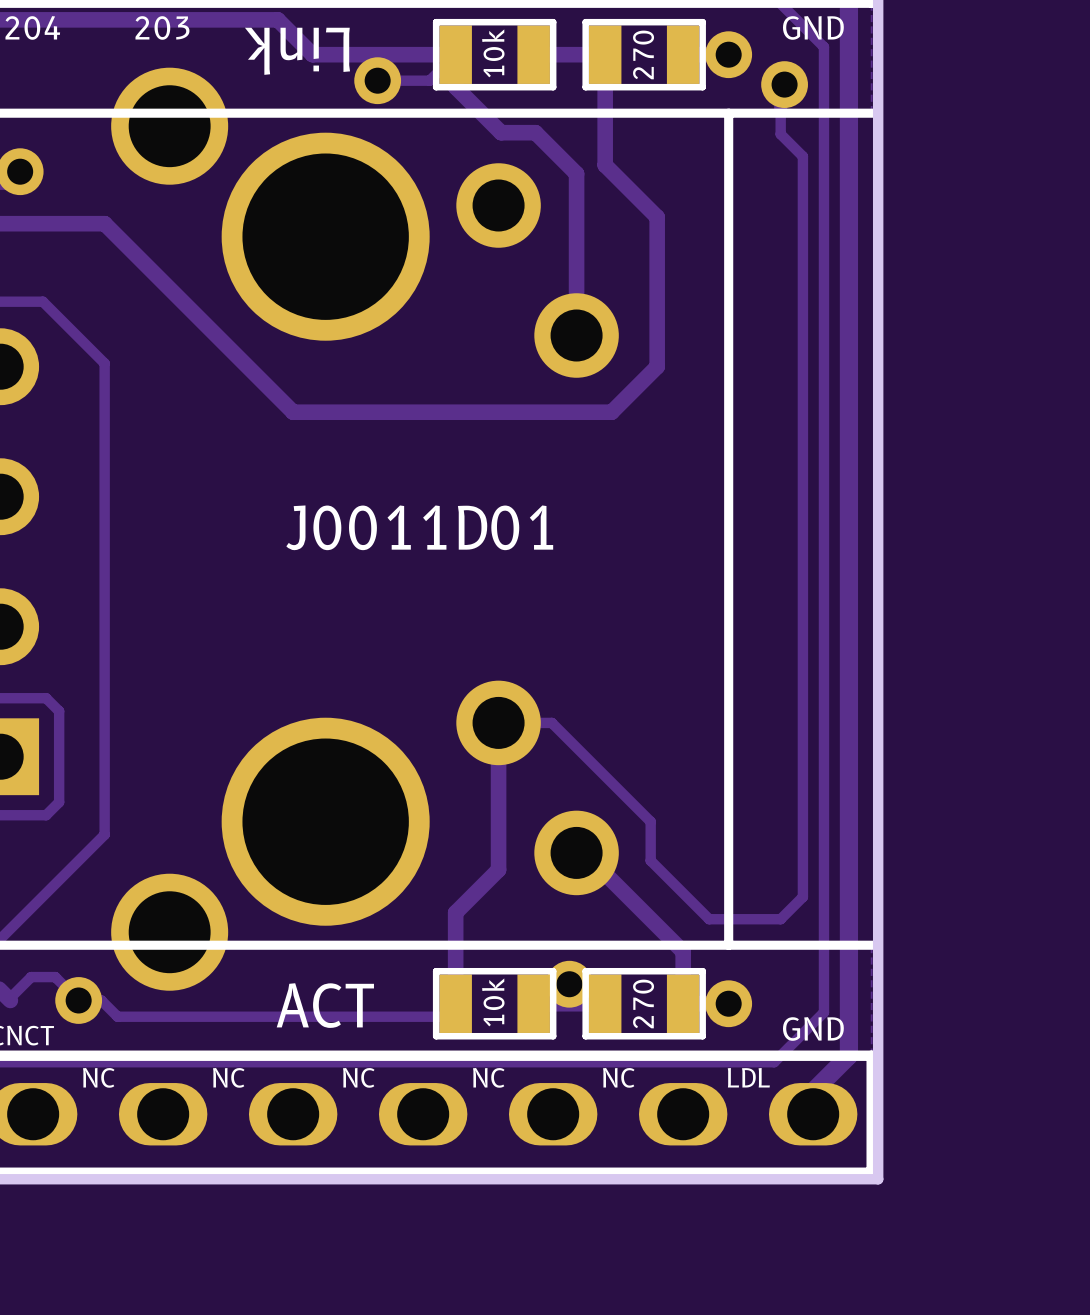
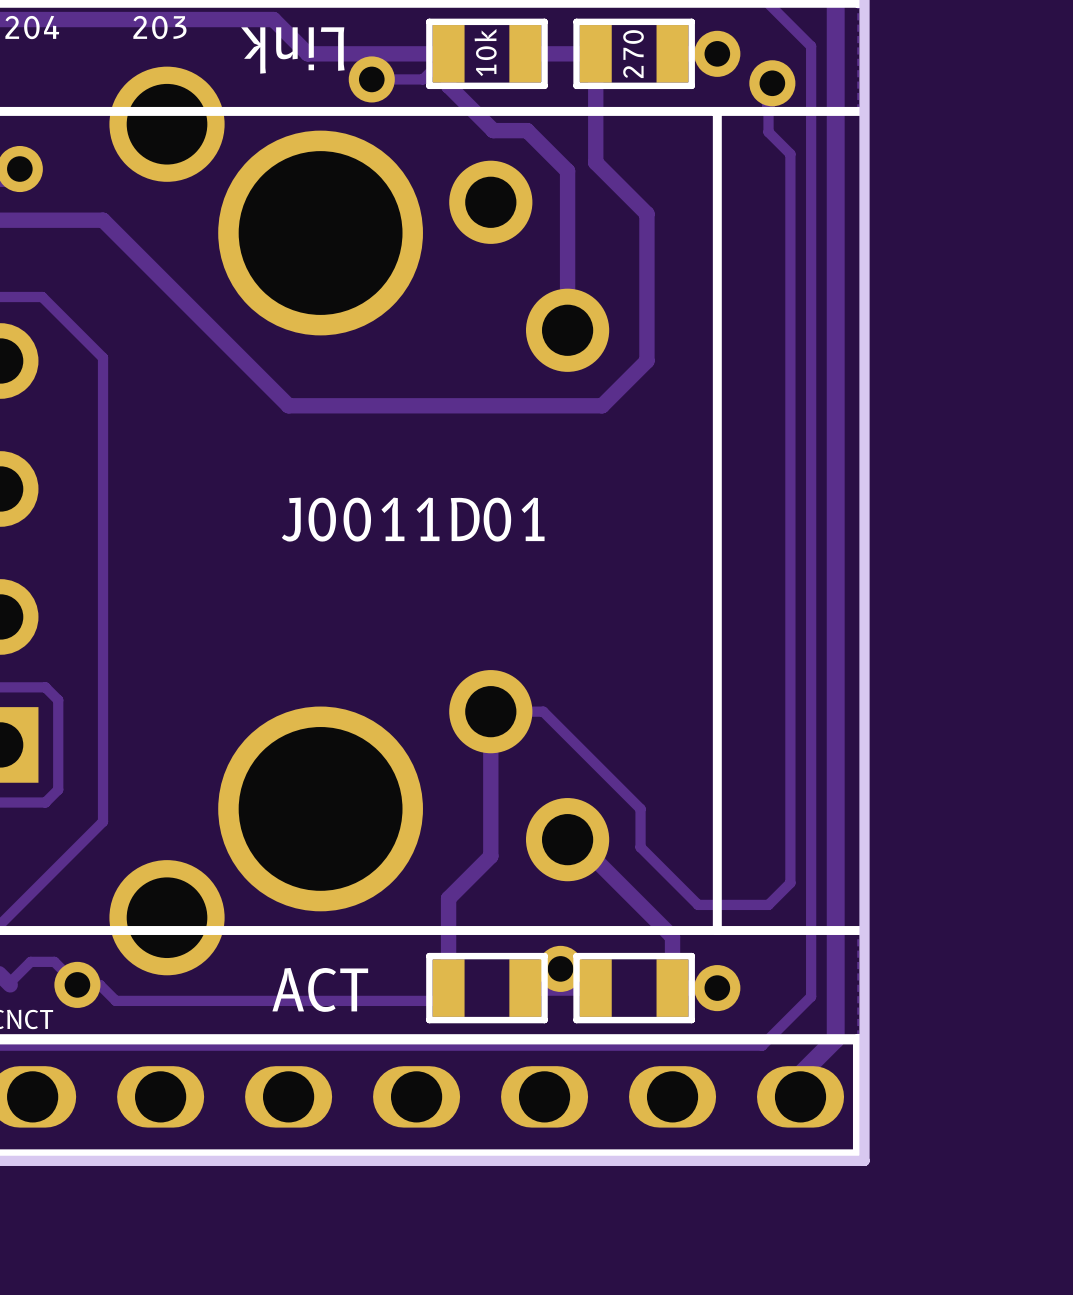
text: GND (813, 27) -> none
part value: 10k (493, 1002) -> none
part value: 270 (643, 1003) -> none
text: GND (813, 1028) -> none
text: NC (98, 1077) -> none
text: NC (228, 1077) -> none
text: NC (358, 1077) -> none
text: NC (488, 1077) -> none
text: NC (618, 1077) -> none
text: LDL (748, 1077) -> none

